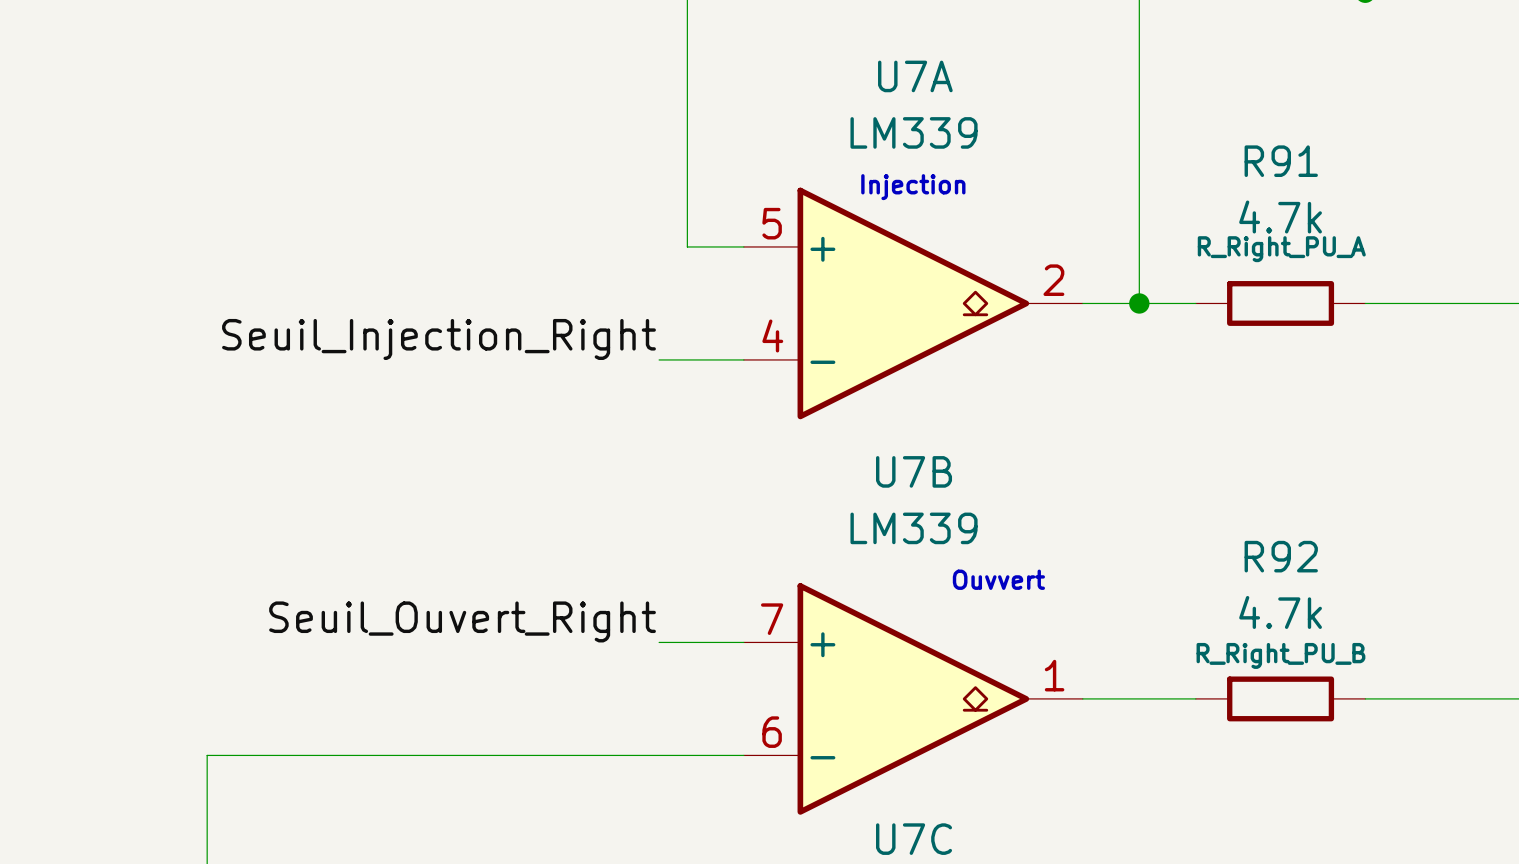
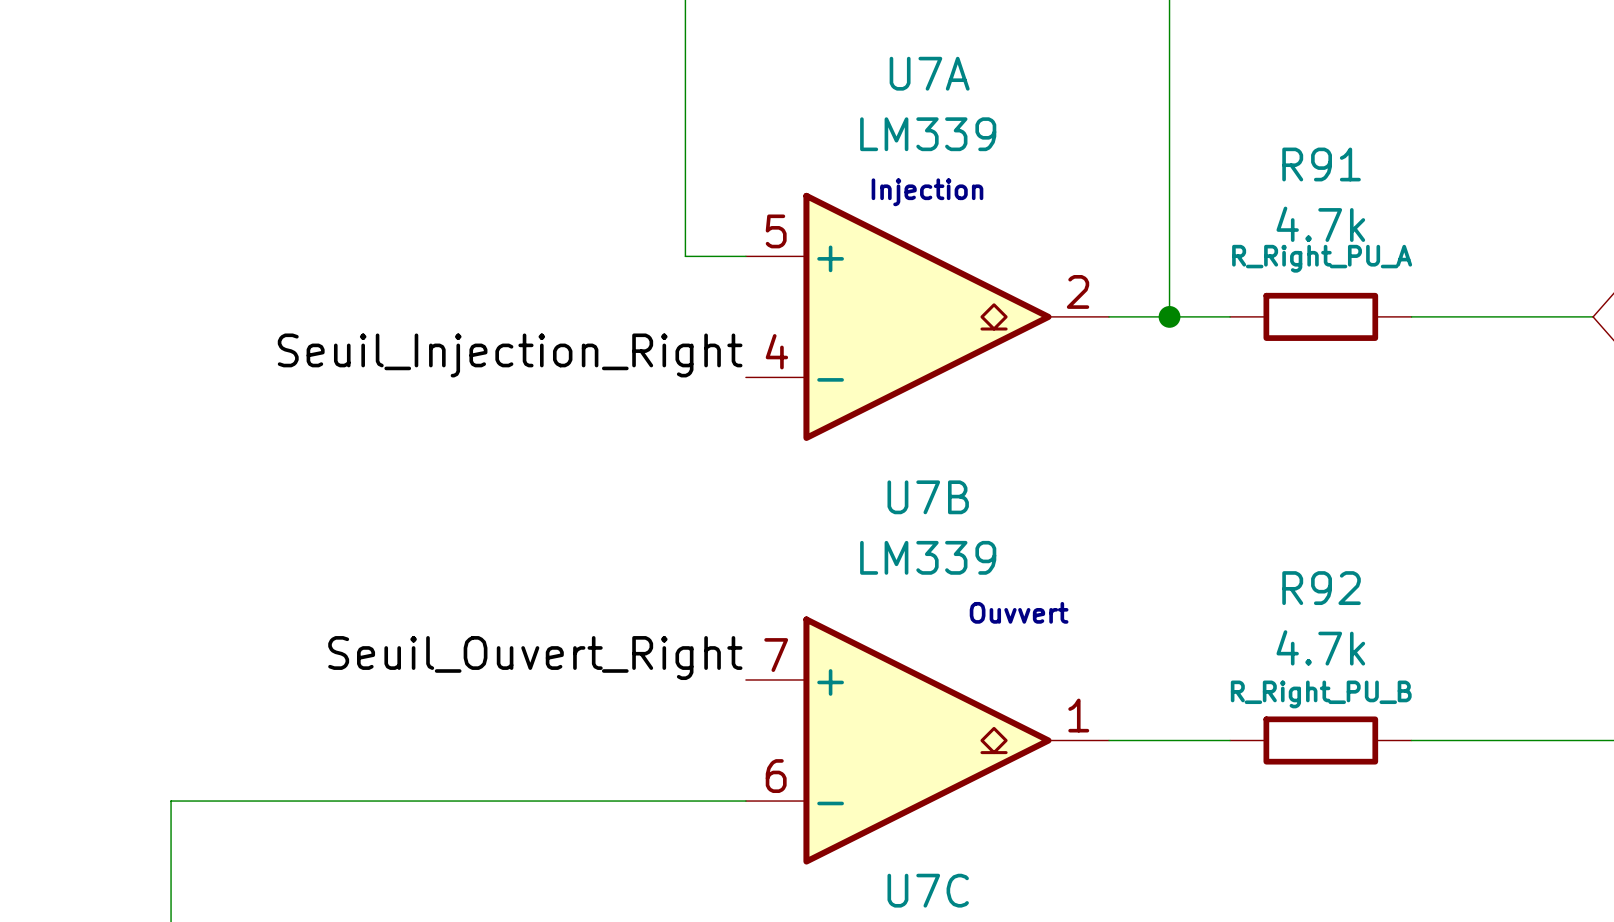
label position: Seuil_Injection_Right (438, 339) -> Seuil_Injection_Right (510, 355)
wire: (659, 359) (743, 359) -> none
label position: Seuil_Ouvert_Right (462, 621) -> Seuil_Ouvert_Right (535, 658)
wire: (659, 642) (743, 642) -> none

